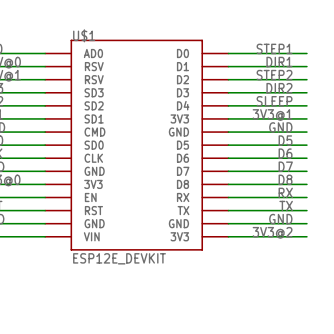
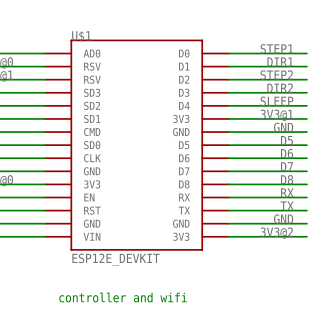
text: none -> controller and wifi (123, 297)

